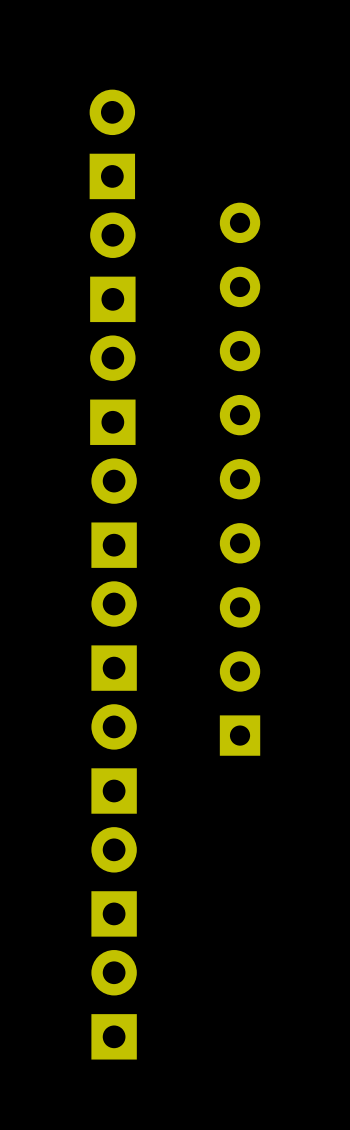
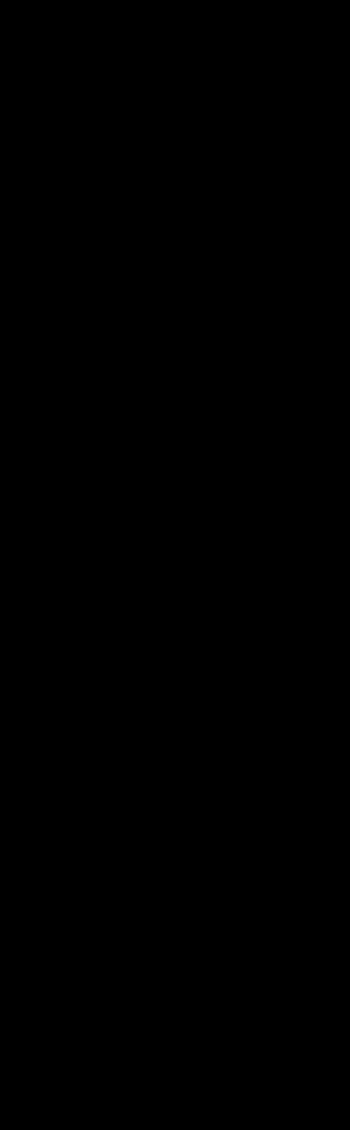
part: (112, 144) -> none
part: (112, 267) -> none
part: (112, 390) -> none
part: (240, 479) -> none
part: (114, 513) -> none
part: (114, 636) -> none
part: (114, 758) -> none
part: (114, 881) -> none
part: (114, 1004) -> none

